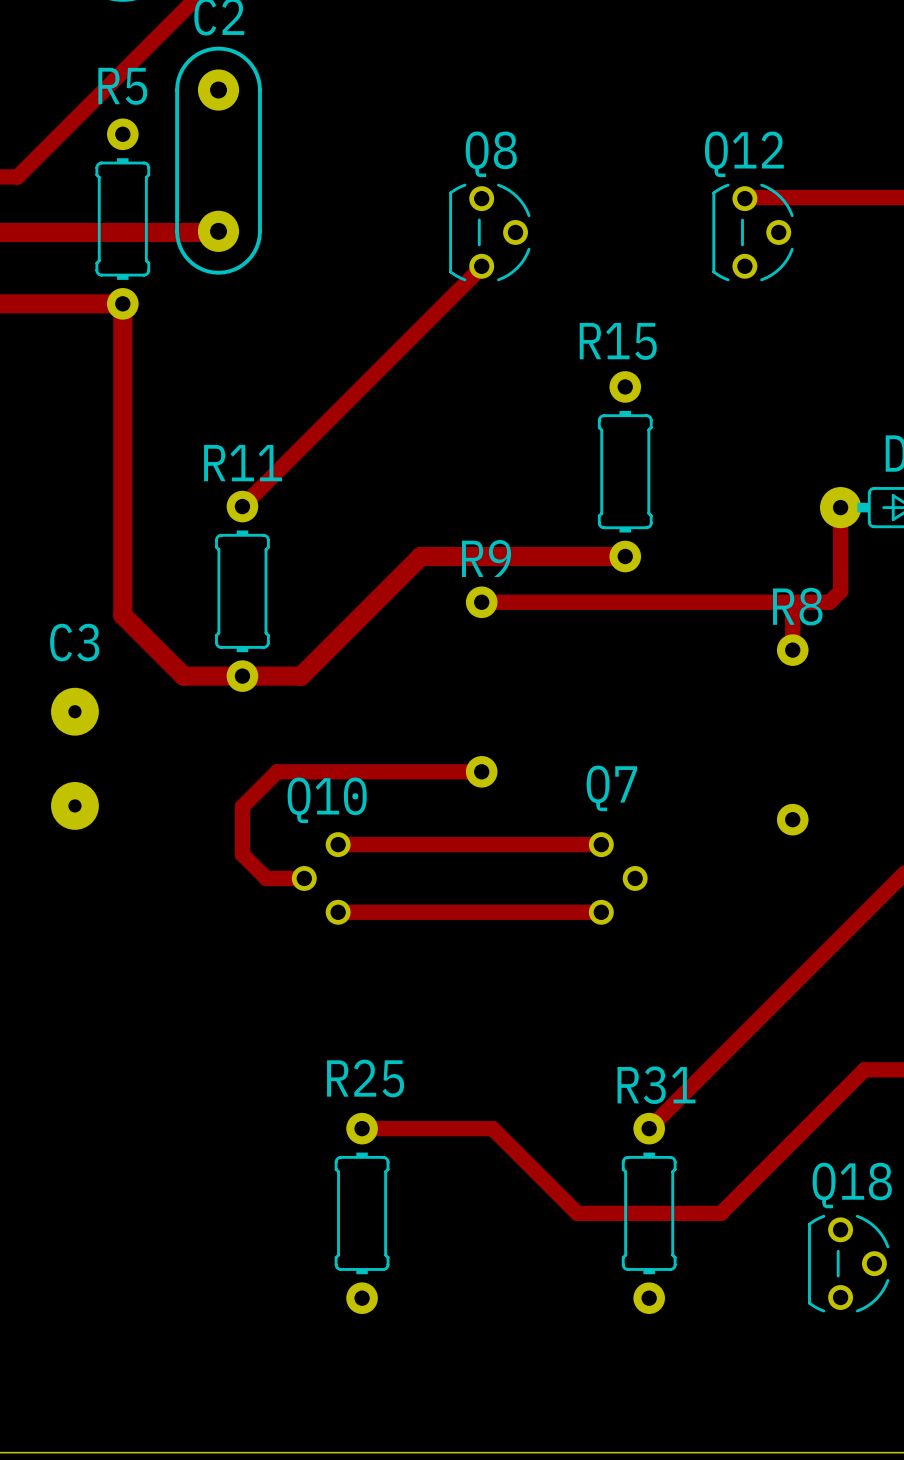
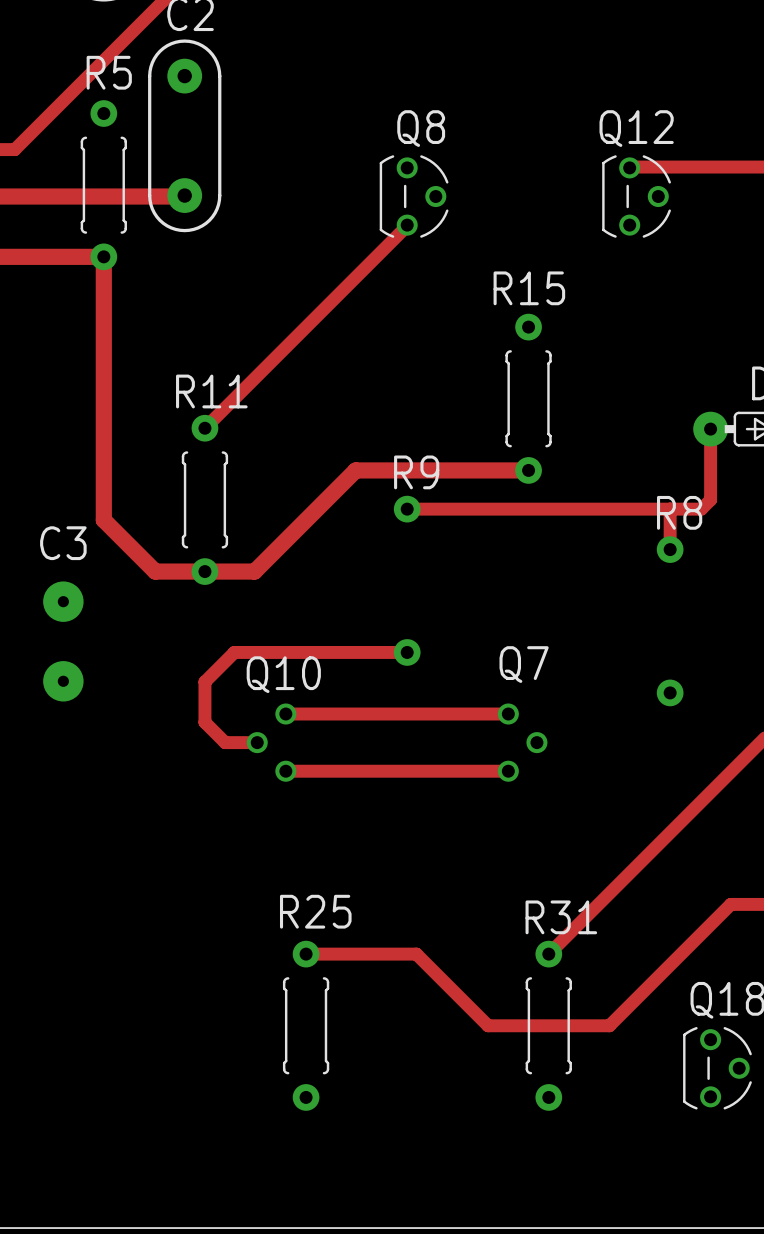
R5 footprint: [95, 118, 151, 320] -> [80, 100, 127, 271]
R15 footprint: [597, 371, 653, 573] -> [505, 313, 552, 484]
R11 footprint: [215, 490, 270, 692] -> [181, 414, 229, 585]
R25 footprint: [334, 1112, 390, 1314] -> [282, 940, 330, 1111]
R31 footprint: [621, 1112, 677, 1314] -> [525, 940, 572, 1111]

